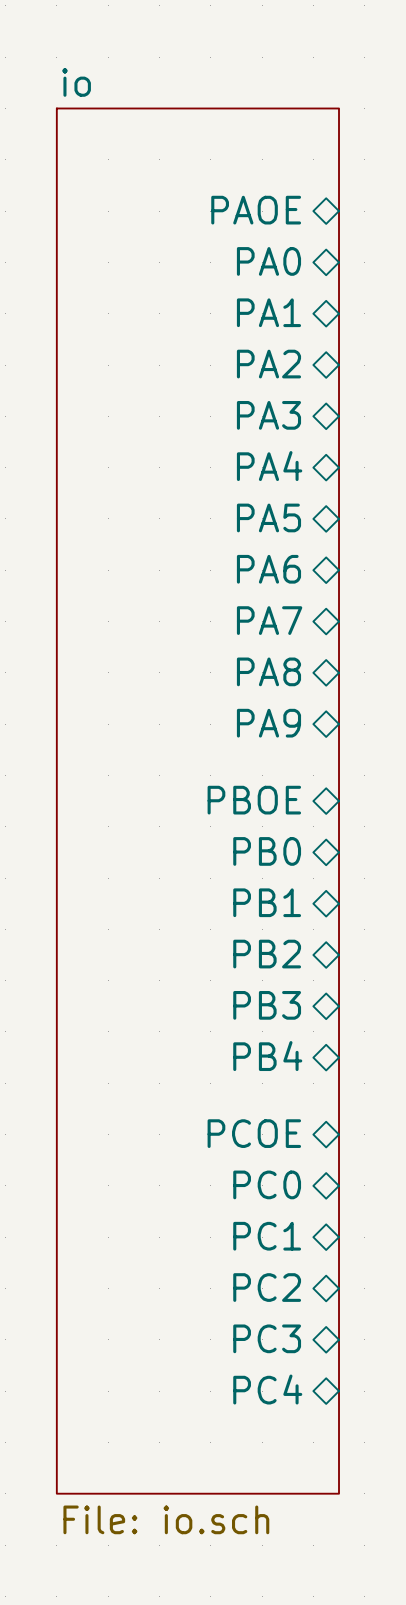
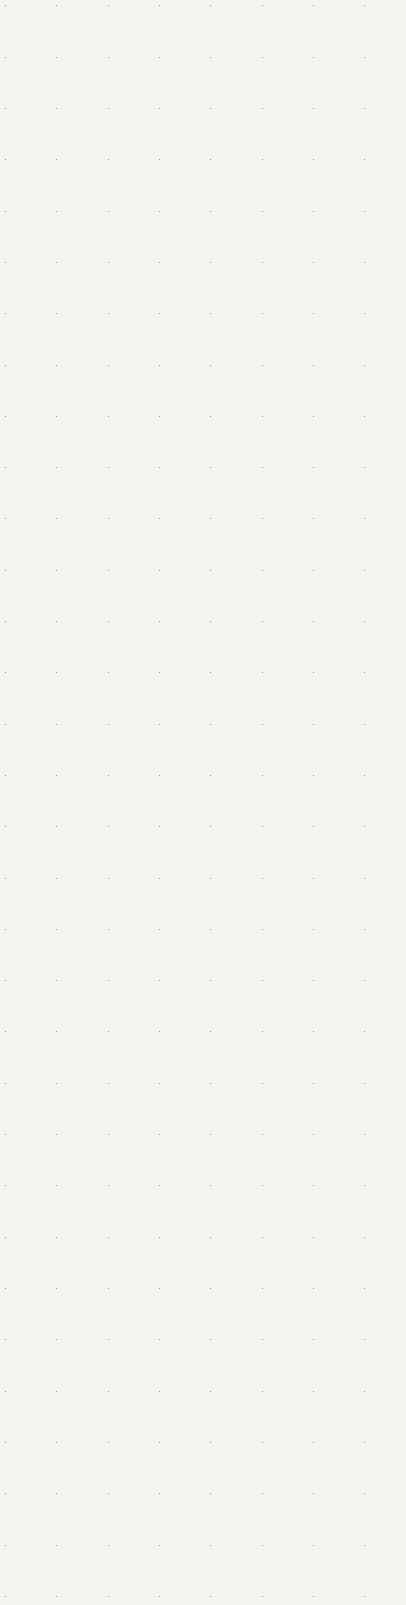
sheet pin: PAOE (256, 210) -> none
sheet pin: PA0 (268, 261) -> none
sheet pin: PA1 (268, 312) -> none
sheet pin: PA2 (268, 364) -> none
sheet pin: PA3 (268, 415) -> none
sheet pin: PA4 (269, 466) -> none
sheet pin: PA5 (268, 517) -> none
sheet pin: PA6 (268, 569) -> none
sheet pin: PA7 (269, 620) -> none
sheet pin: PA8 (268, 671) -> none
sheet pin: PA9 (268, 723) -> none
sheet pin: PBOE (254, 800) -> none
sheet io: File: io.sch (197, 801) -> none
sheet pin: PB0 (267, 851) -> none
sheet pin: PB1 (267, 902) -> none
sheet pin: PB2 (267, 954) -> none
sheet pin: PB3 (267, 1005) -> none
sheet pin: PB4 (267, 1056) -> none
sheet pin: PCOE (254, 1133) -> none
sheet pin: PC0 (267, 1184) -> none
sheet pin: PC1 (267, 1236) -> none
sheet pin: PC2 (267, 1287) -> none
sheet pin: PC3 (267, 1338) -> none
sheet pin: PC4 (267, 1389) -> none

